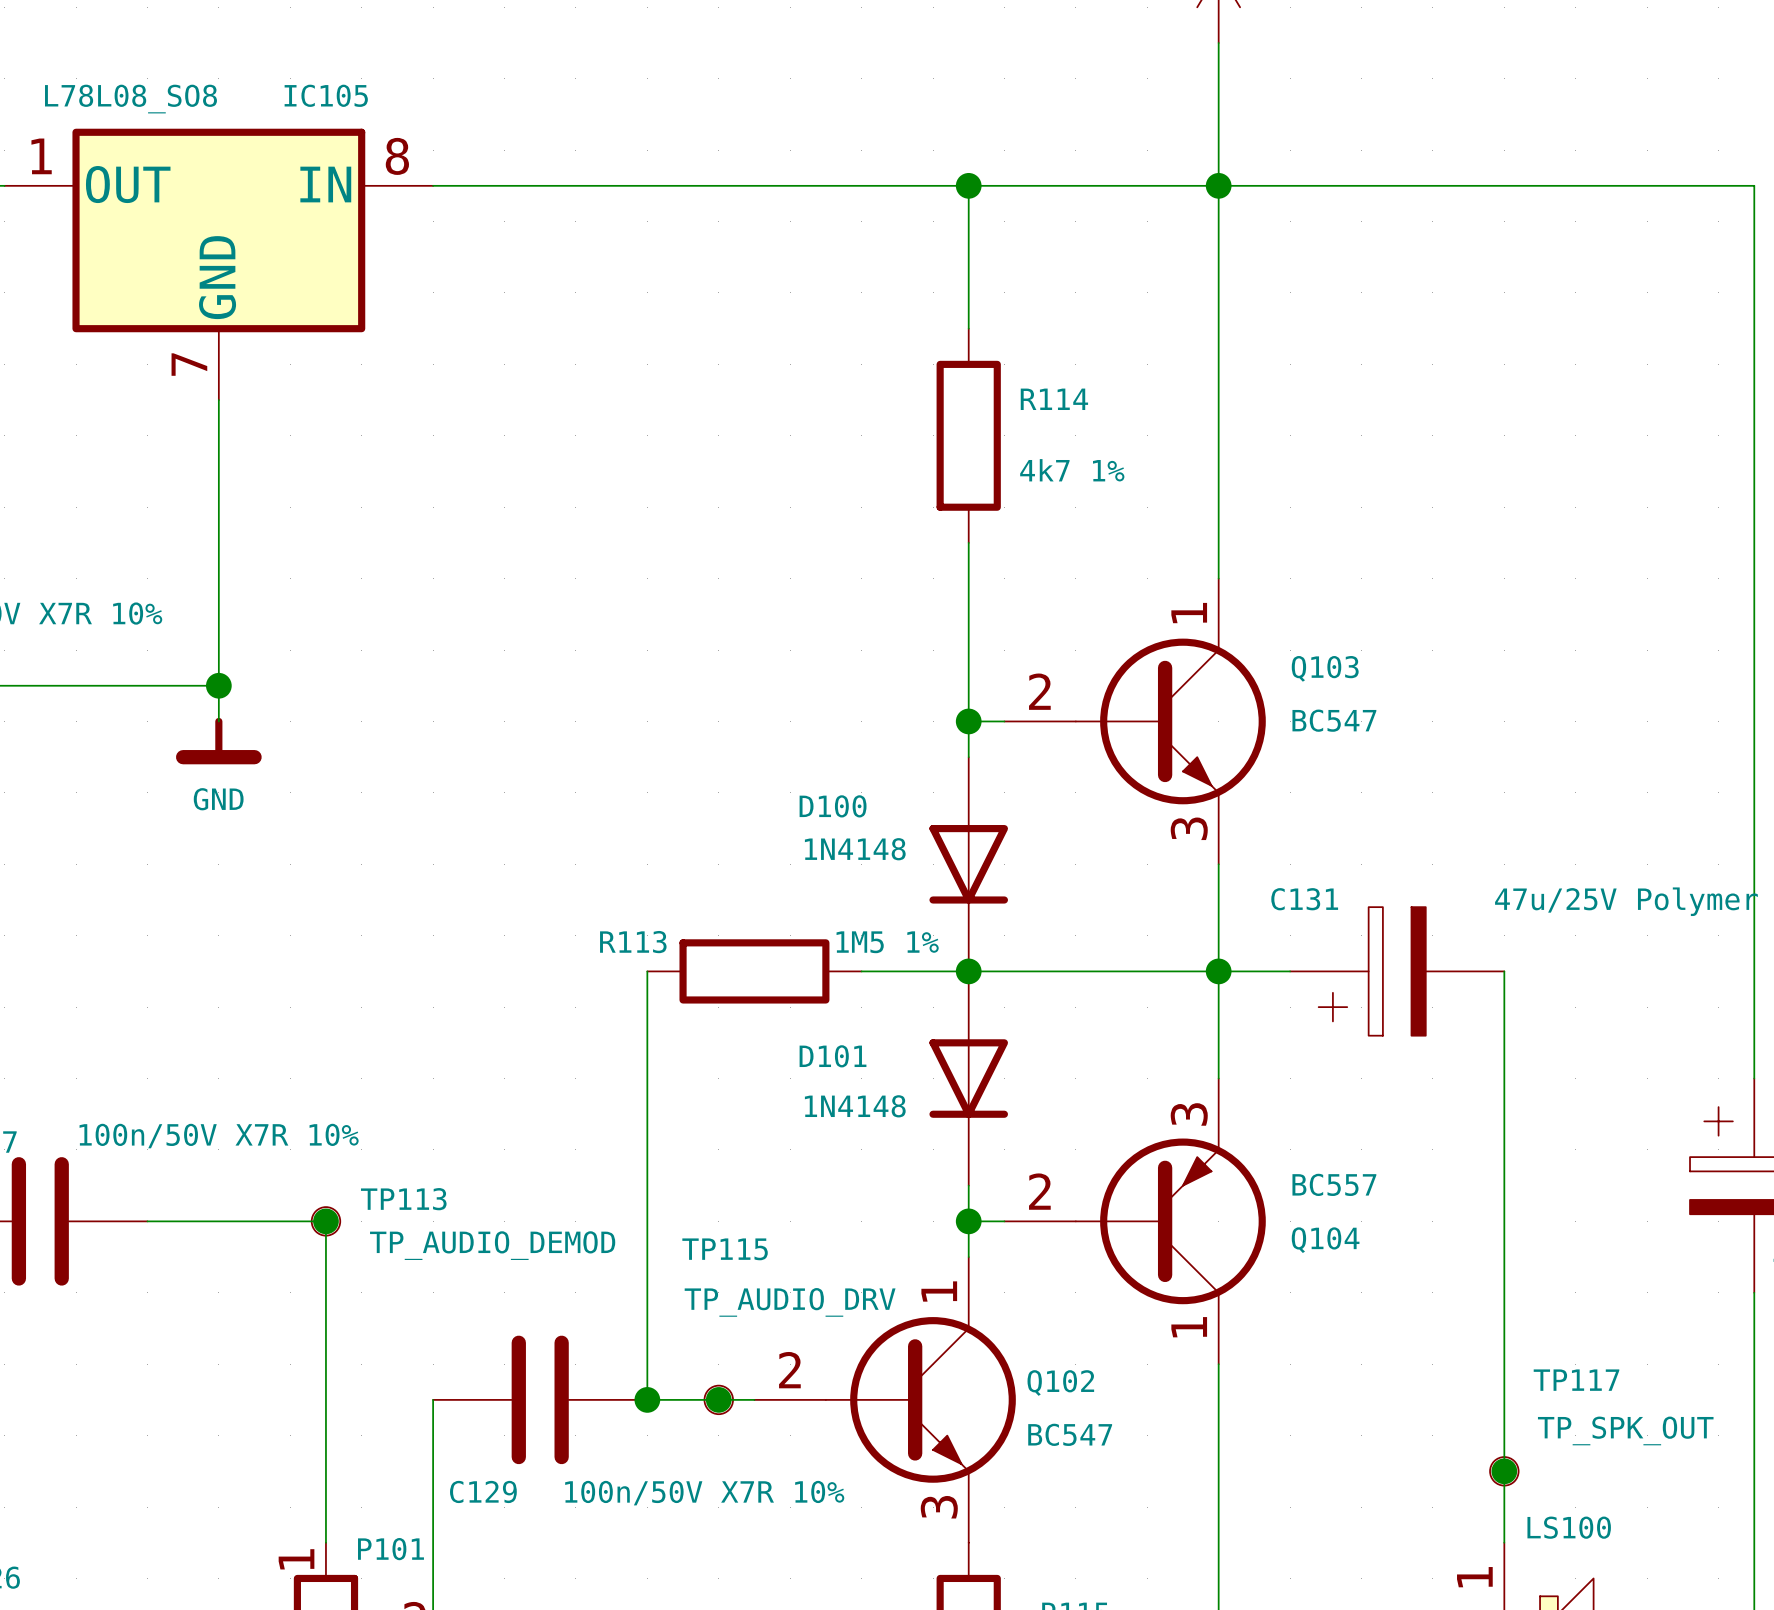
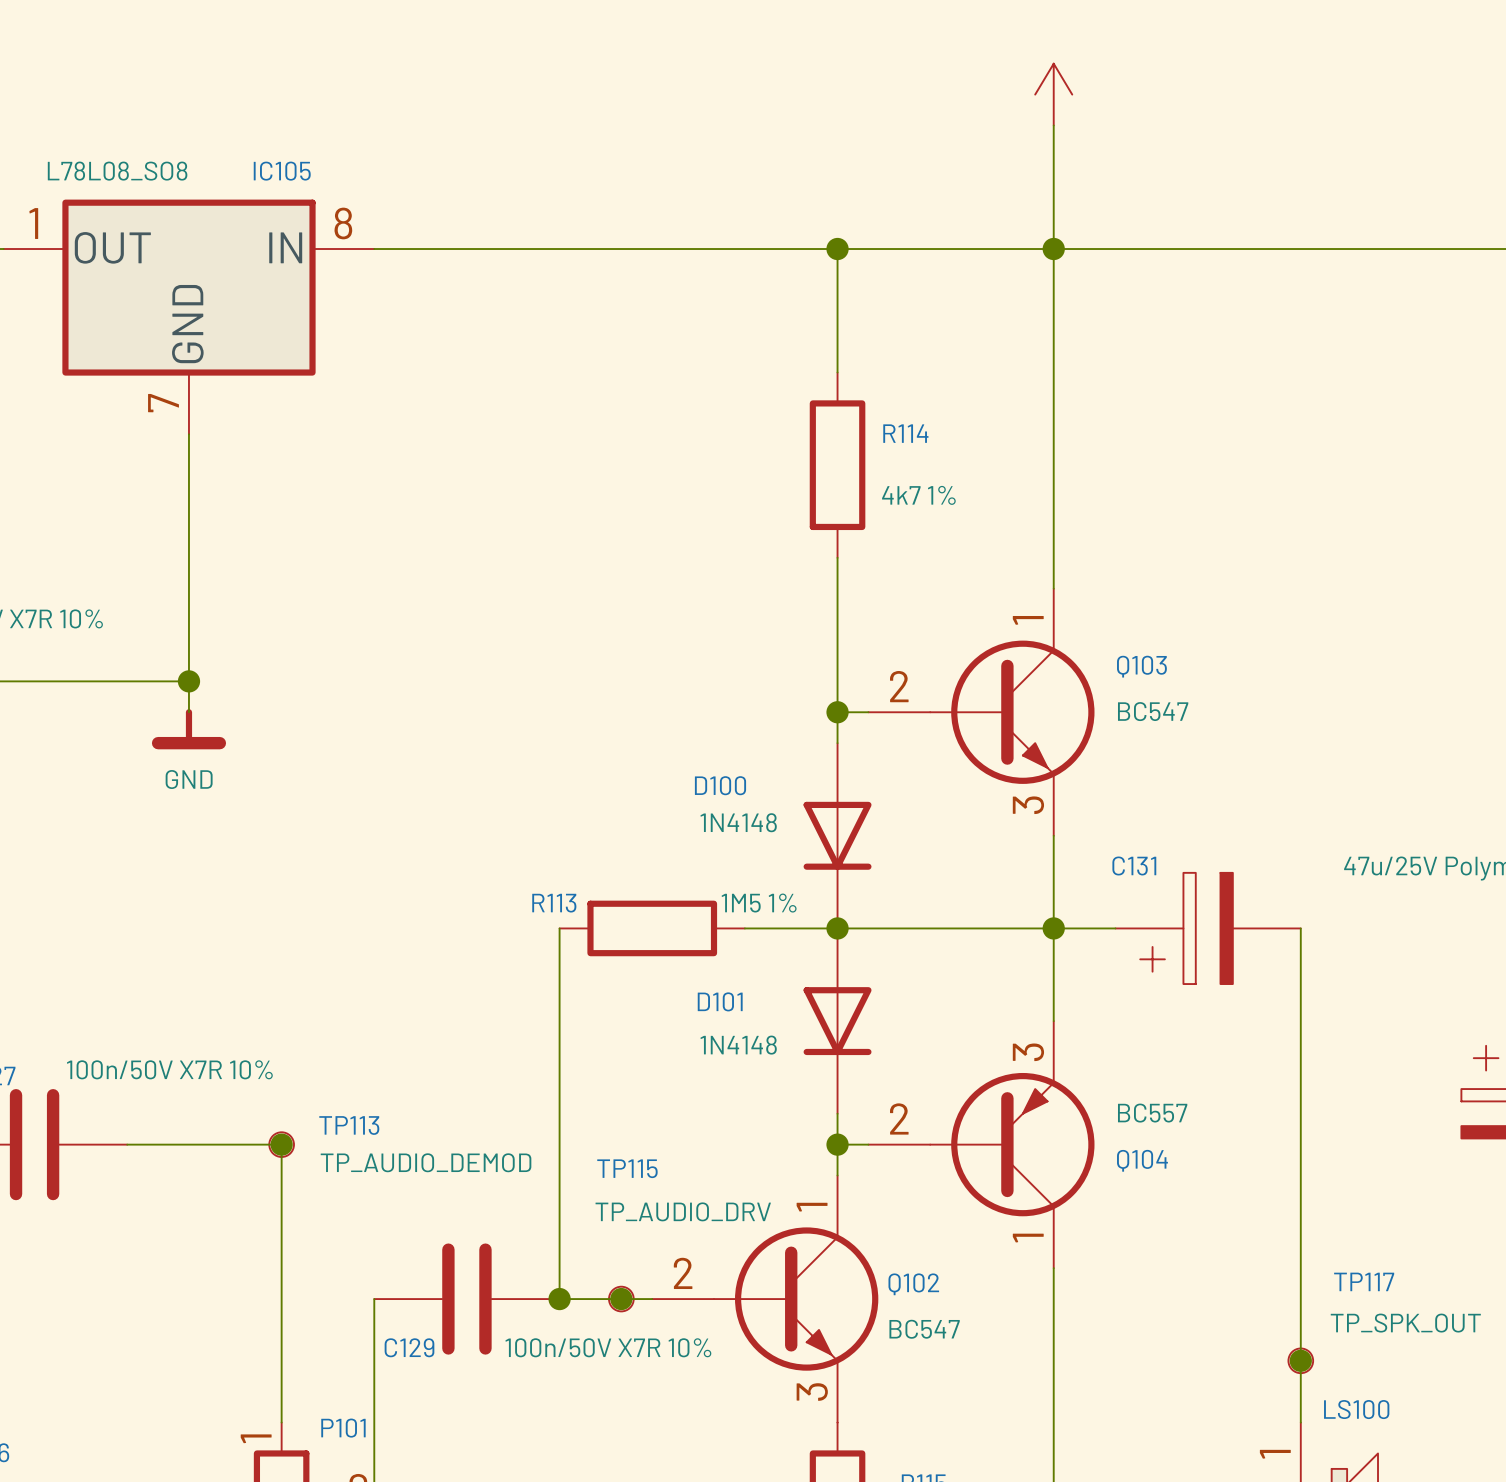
C129 name position: C129 (483, 1491) -> C129 (409, 1347)
C129 value position: 100n/50V X7R 10% (704, 1493) -> 100n/50V X7R 10% (608, 1347)

